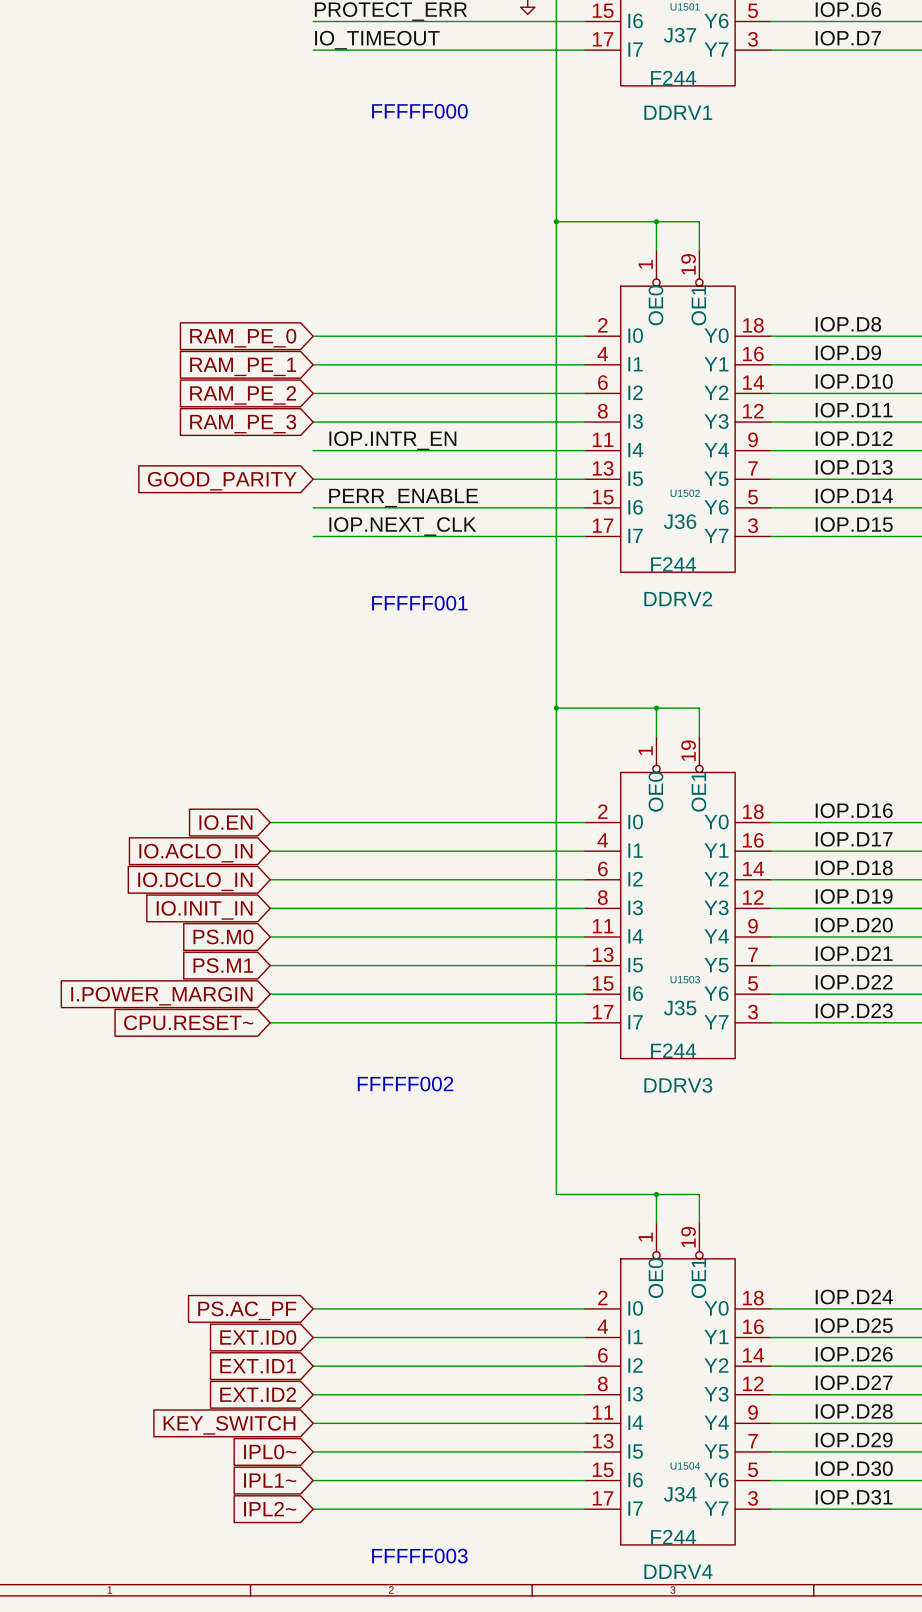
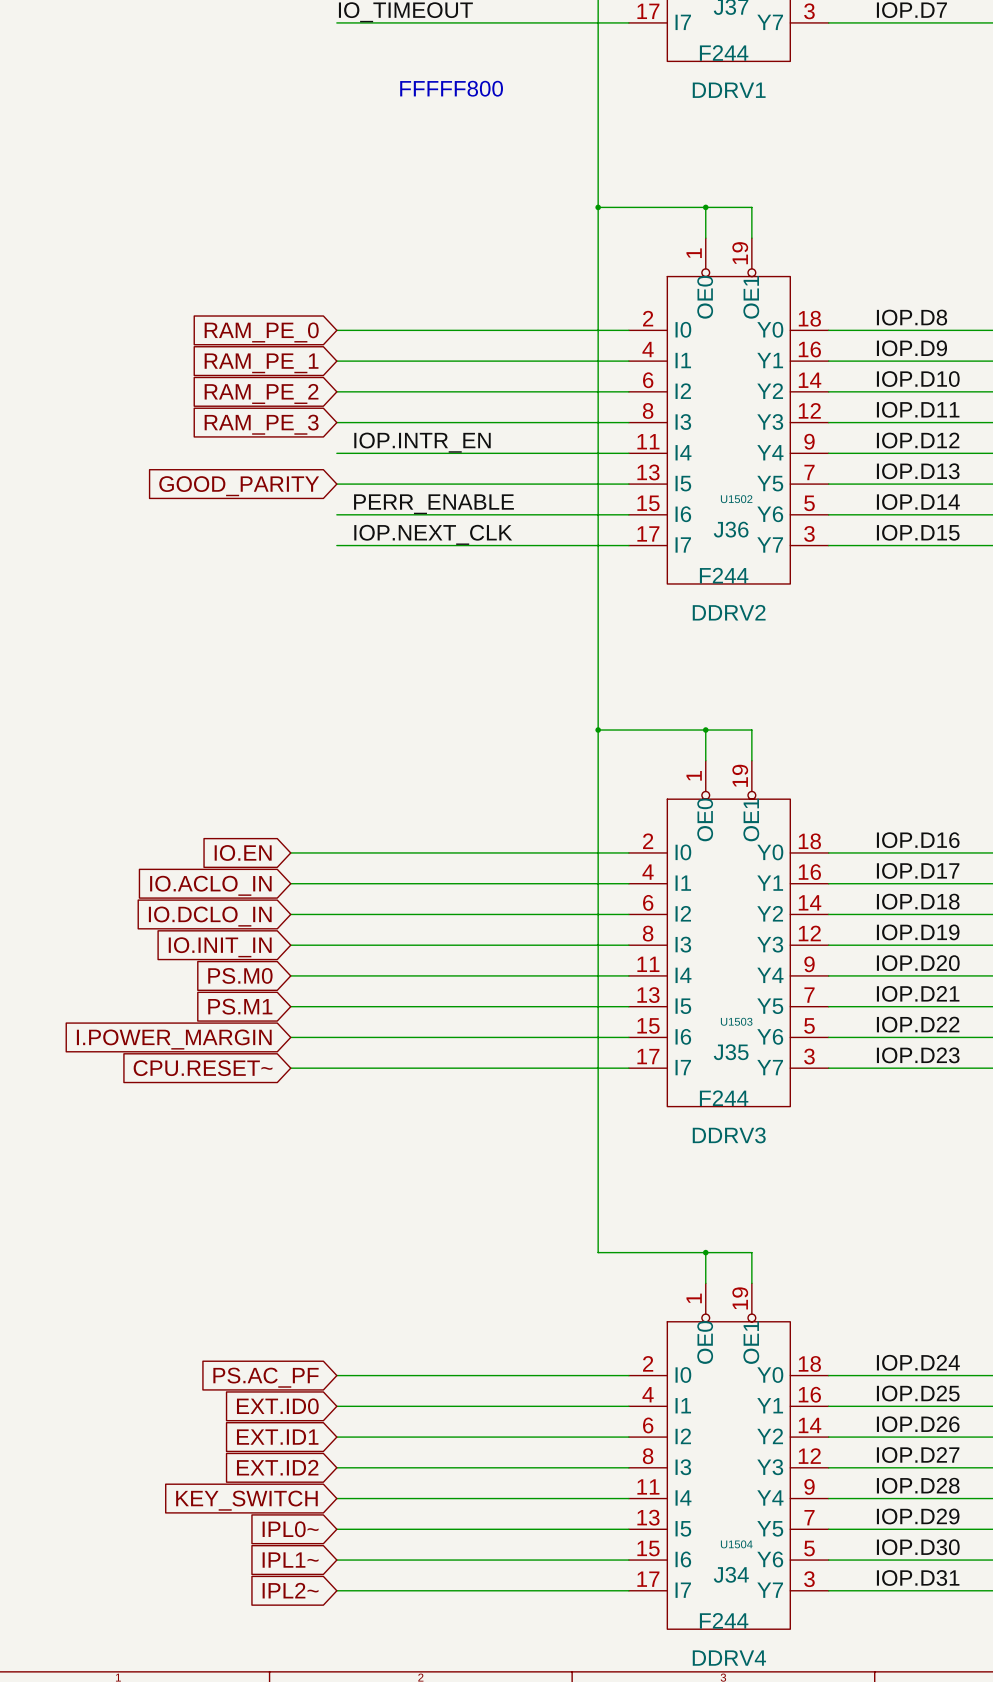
text: FFFFF000 (419, 111) -> FFFFF800 (451, 88)
text: FFFFF001 (419, 603) -> none
text: FFFFF002 (405, 1084) -> none
text: FFFFF003 (419, 1556) -> none

